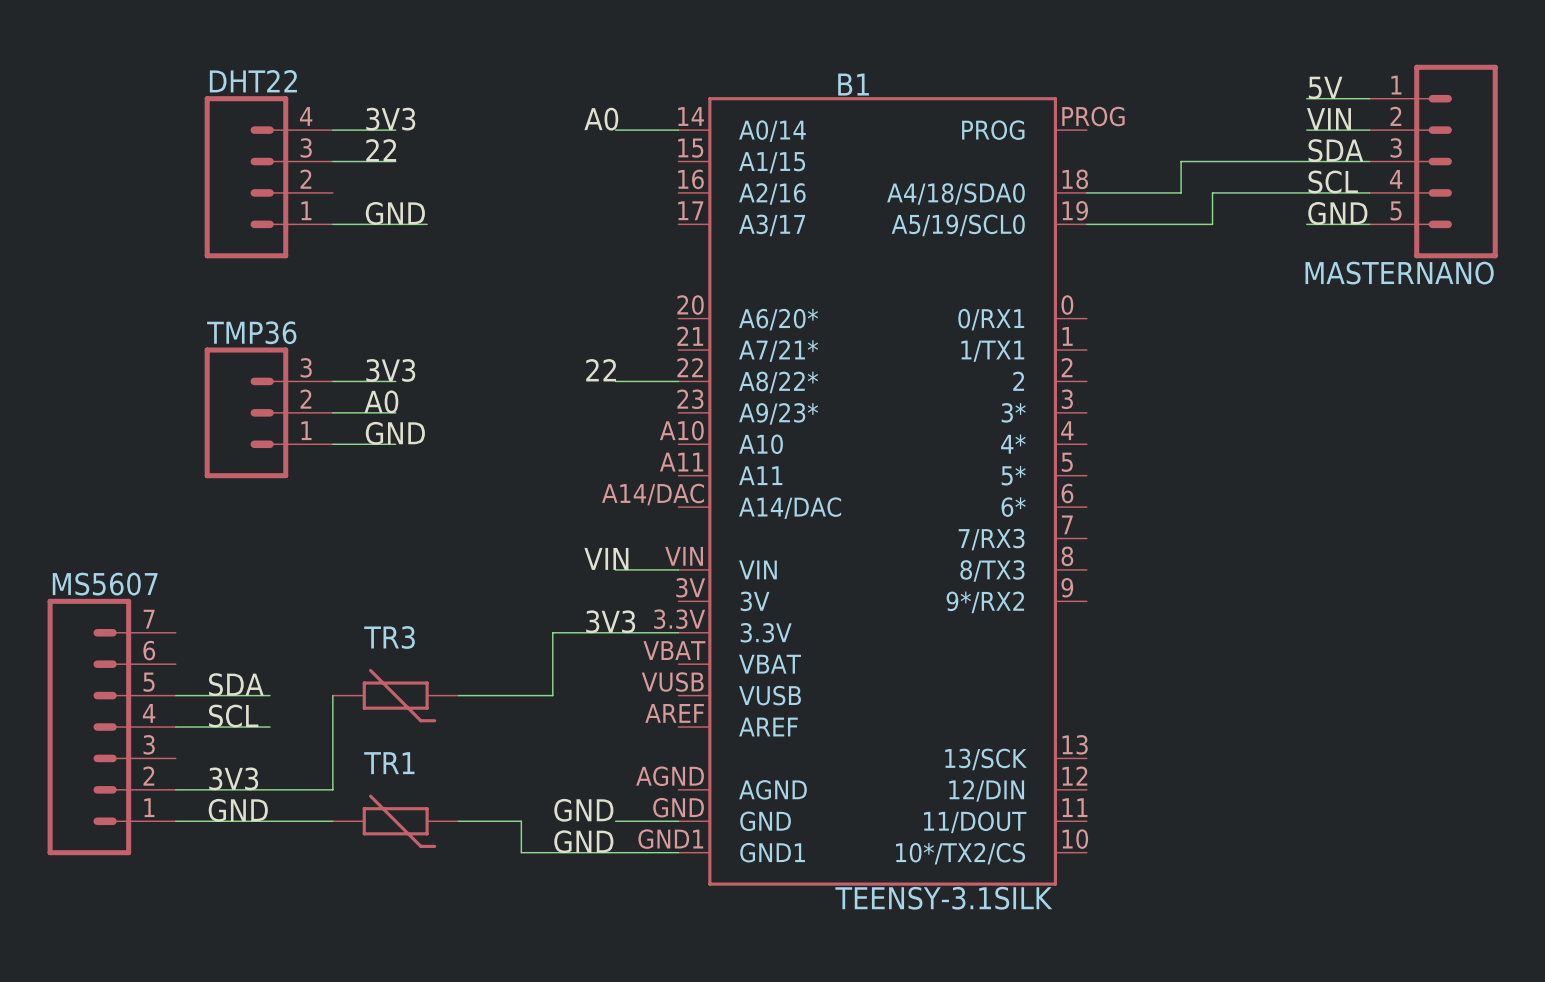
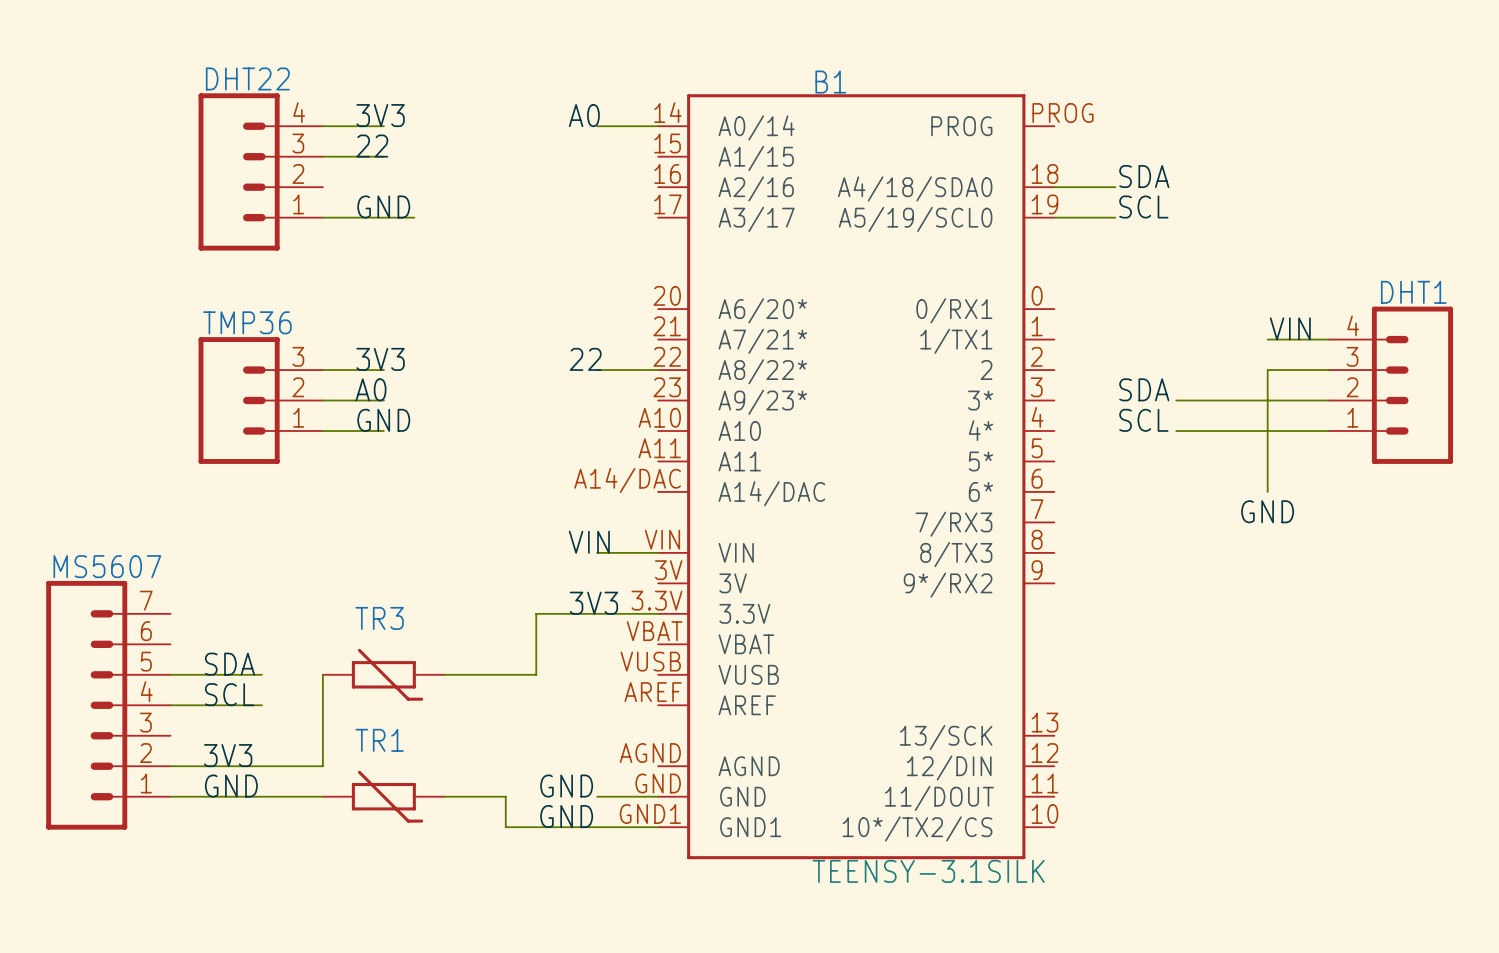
label: 5V (1325, 87) -> none
wire: (1306, 98) (1369, 98) -> none
label position: VIN (1328, 119) -> VIN (1290, 328)
wire: (1306, 130) (1369, 130) -> none
label: SDA (1335, 150) -> none
wire: (1369, 161) (1181, 161) (1181, 192) (1149, 192) -> none
MASTERNANO: (1433, 161) -> none
label: none -> SDA (1144, 176)
label: SCL (1333, 181) -> none
wire: (1369, 192) (1212, 192) (1212, 224) (1149, 224) -> none
label: none -> SCL (1143, 206)
label: GND (1337, 213) -> none
wire: (1306, 224) (1369, 224) -> (1267, 339) (1328, 339)
wire: none -> (1328, 370) (1267, 370) (1267, 491)
DHT1: none -> (1390, 385)
label: none -> SDA (1144, 389)
wire: none -> (1176, 400) (1328, 400)
label: none -> SCL (1143, 420)
wire: none -> (1176, 430) (1328, 430)
label: none -> GND (1267, 511)

